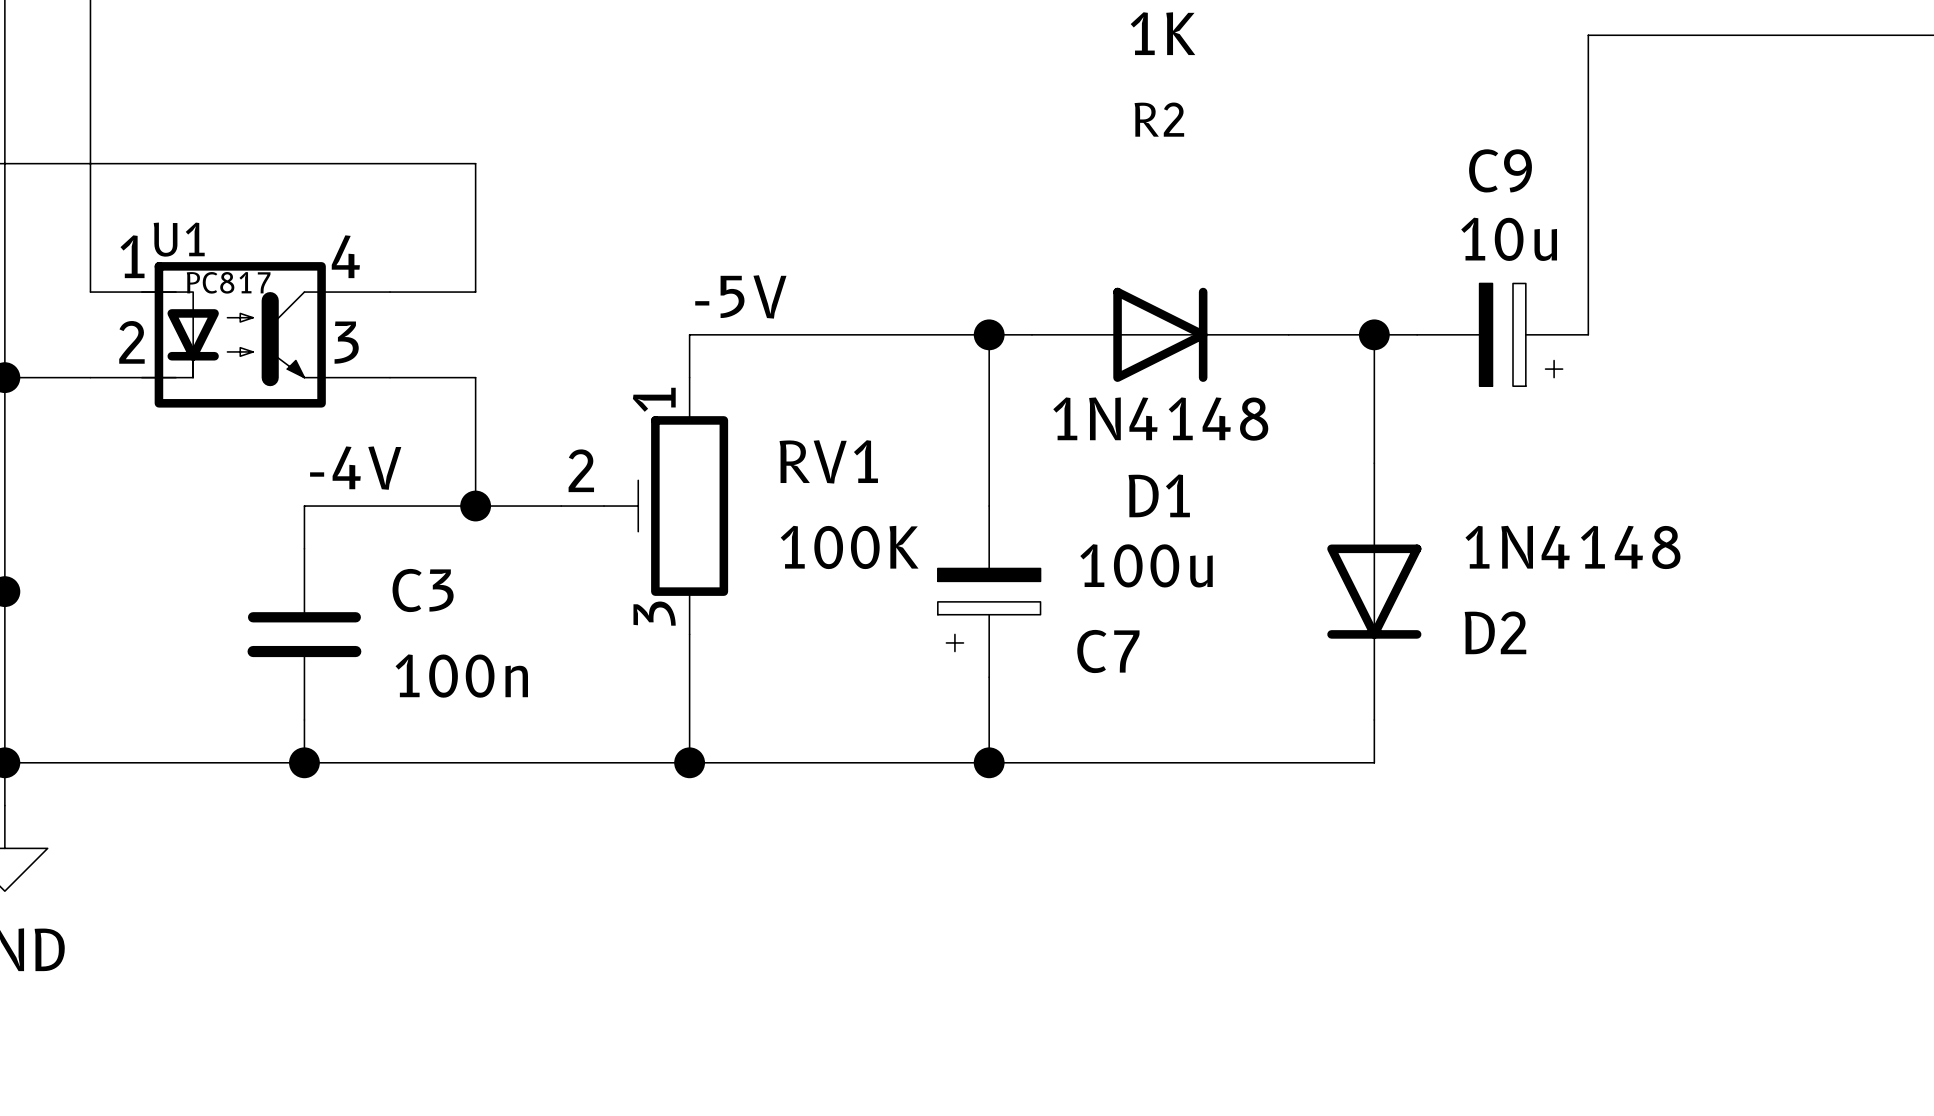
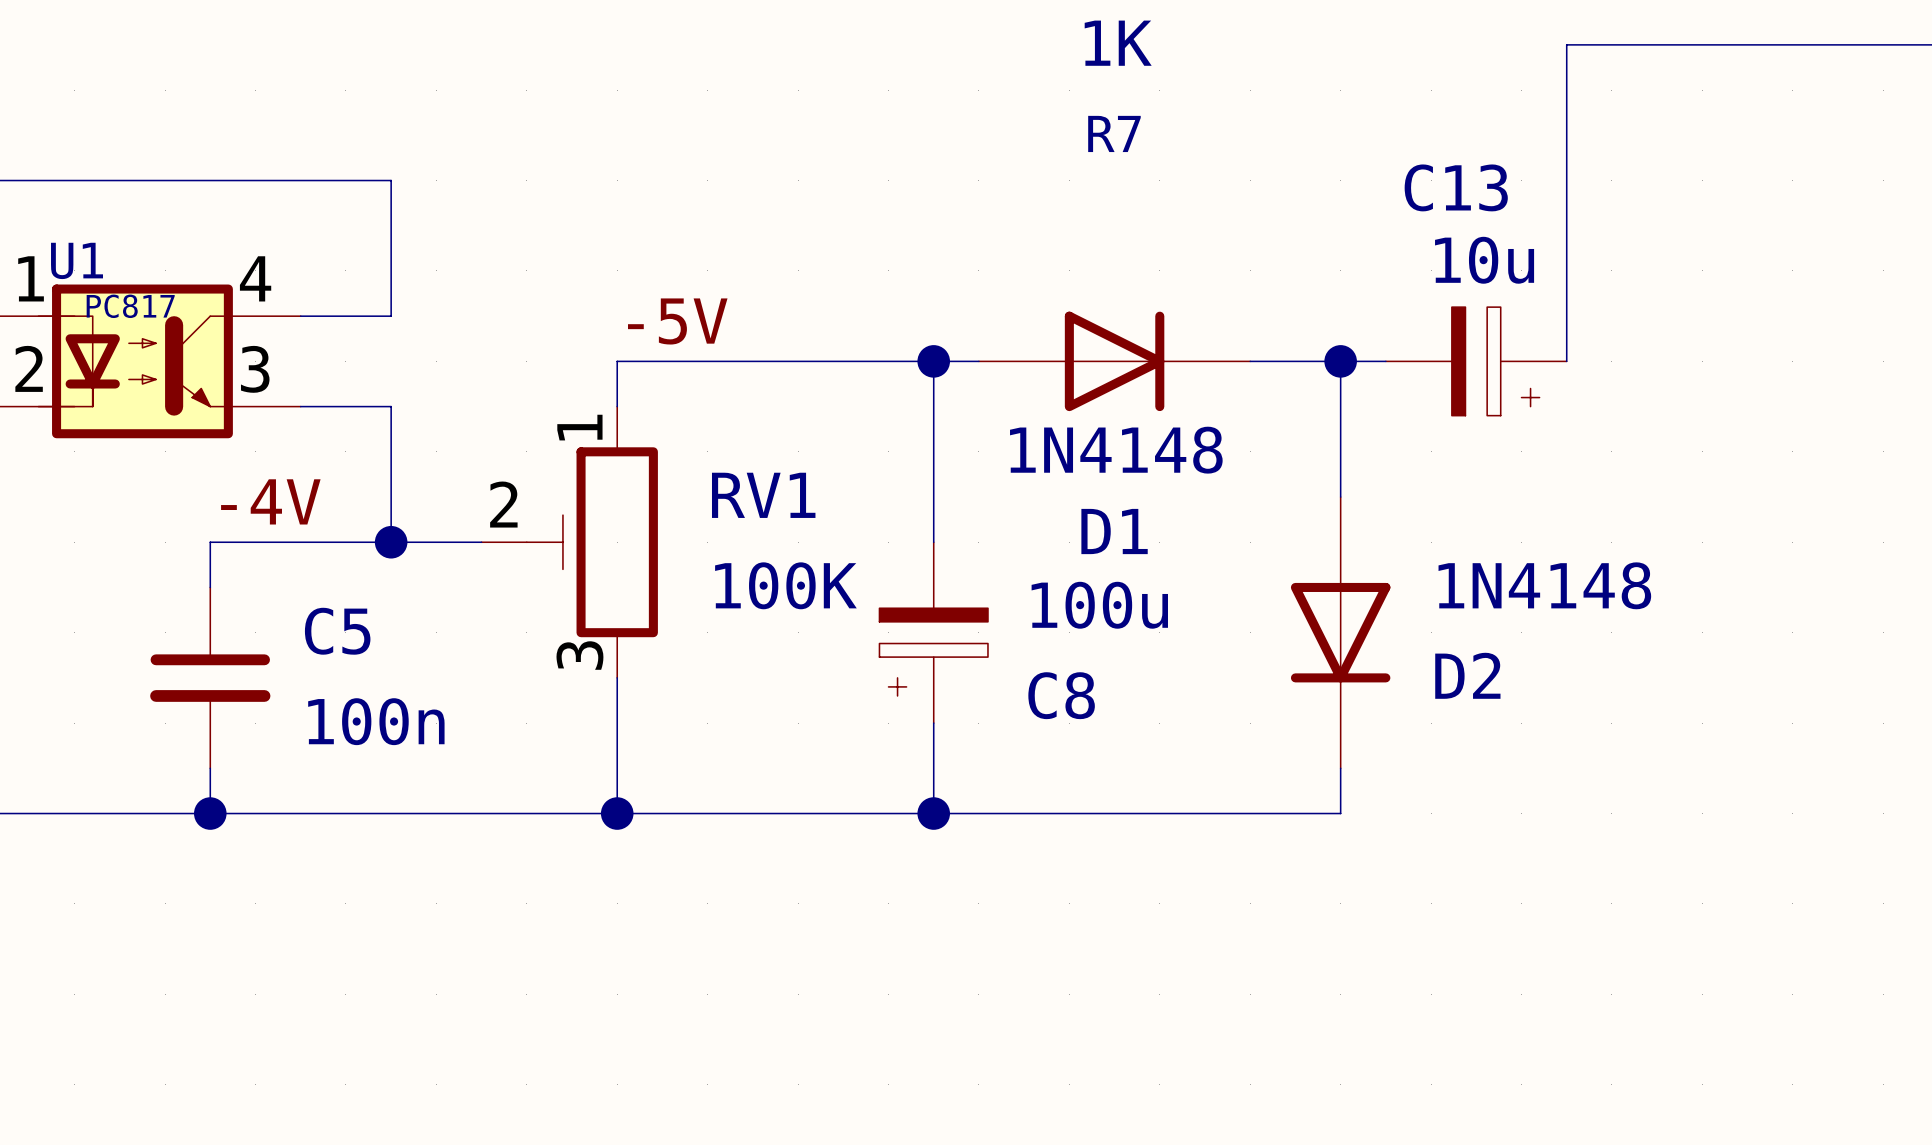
R2 name: R2 (1159, 119) -> R7 (1114, 133)
C9 name: C9 (1500, 170) -> C13 (1456, 187)
C3 name: C3 (423, 590) -> C5 (337, 631)
C7 name: C7 (1108, 651) -> C8 (1061, 695)

